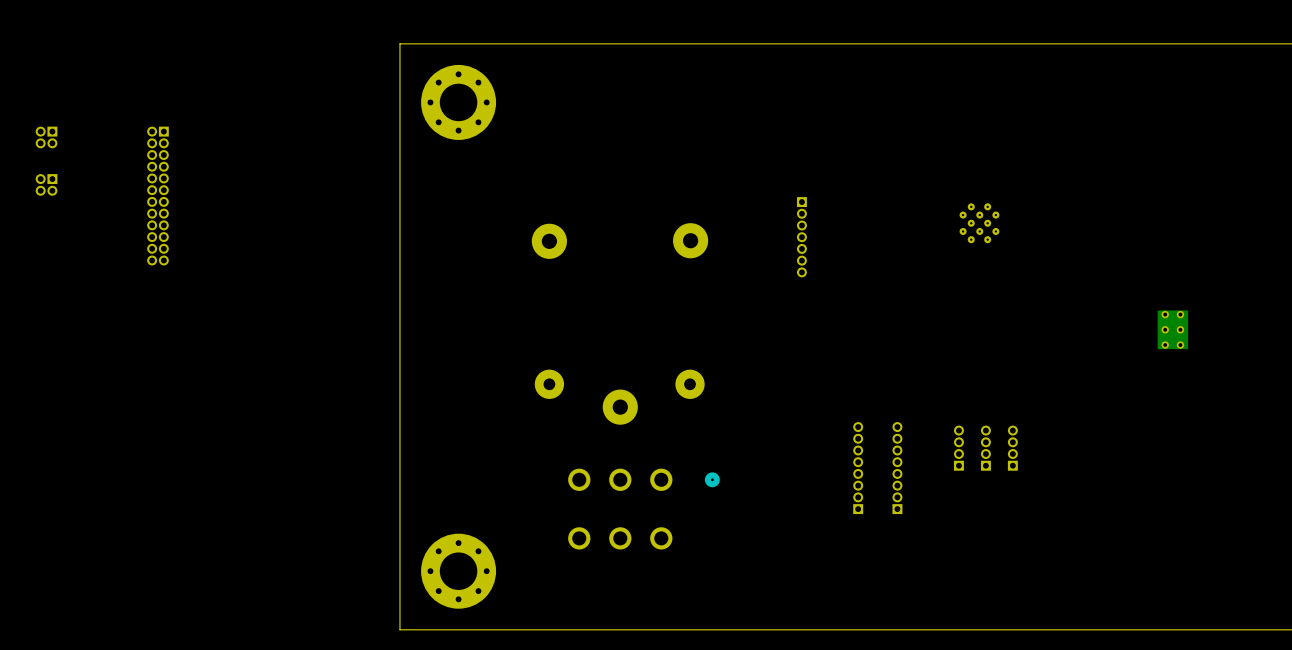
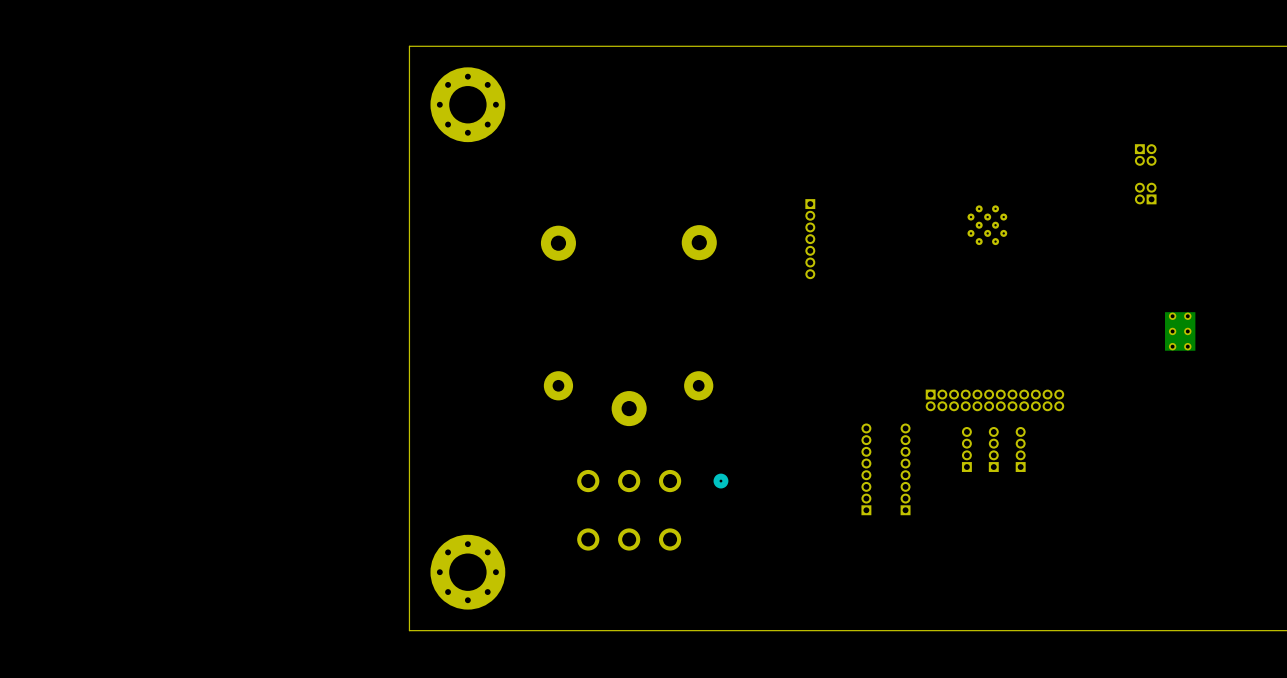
part: (46, 137) -> none
part: none -> (1145, 154)
part: (46, 184) -> none
part: none -> (1145, 193)
part: (157, 196) -> none
part: none -> (994, 400)

